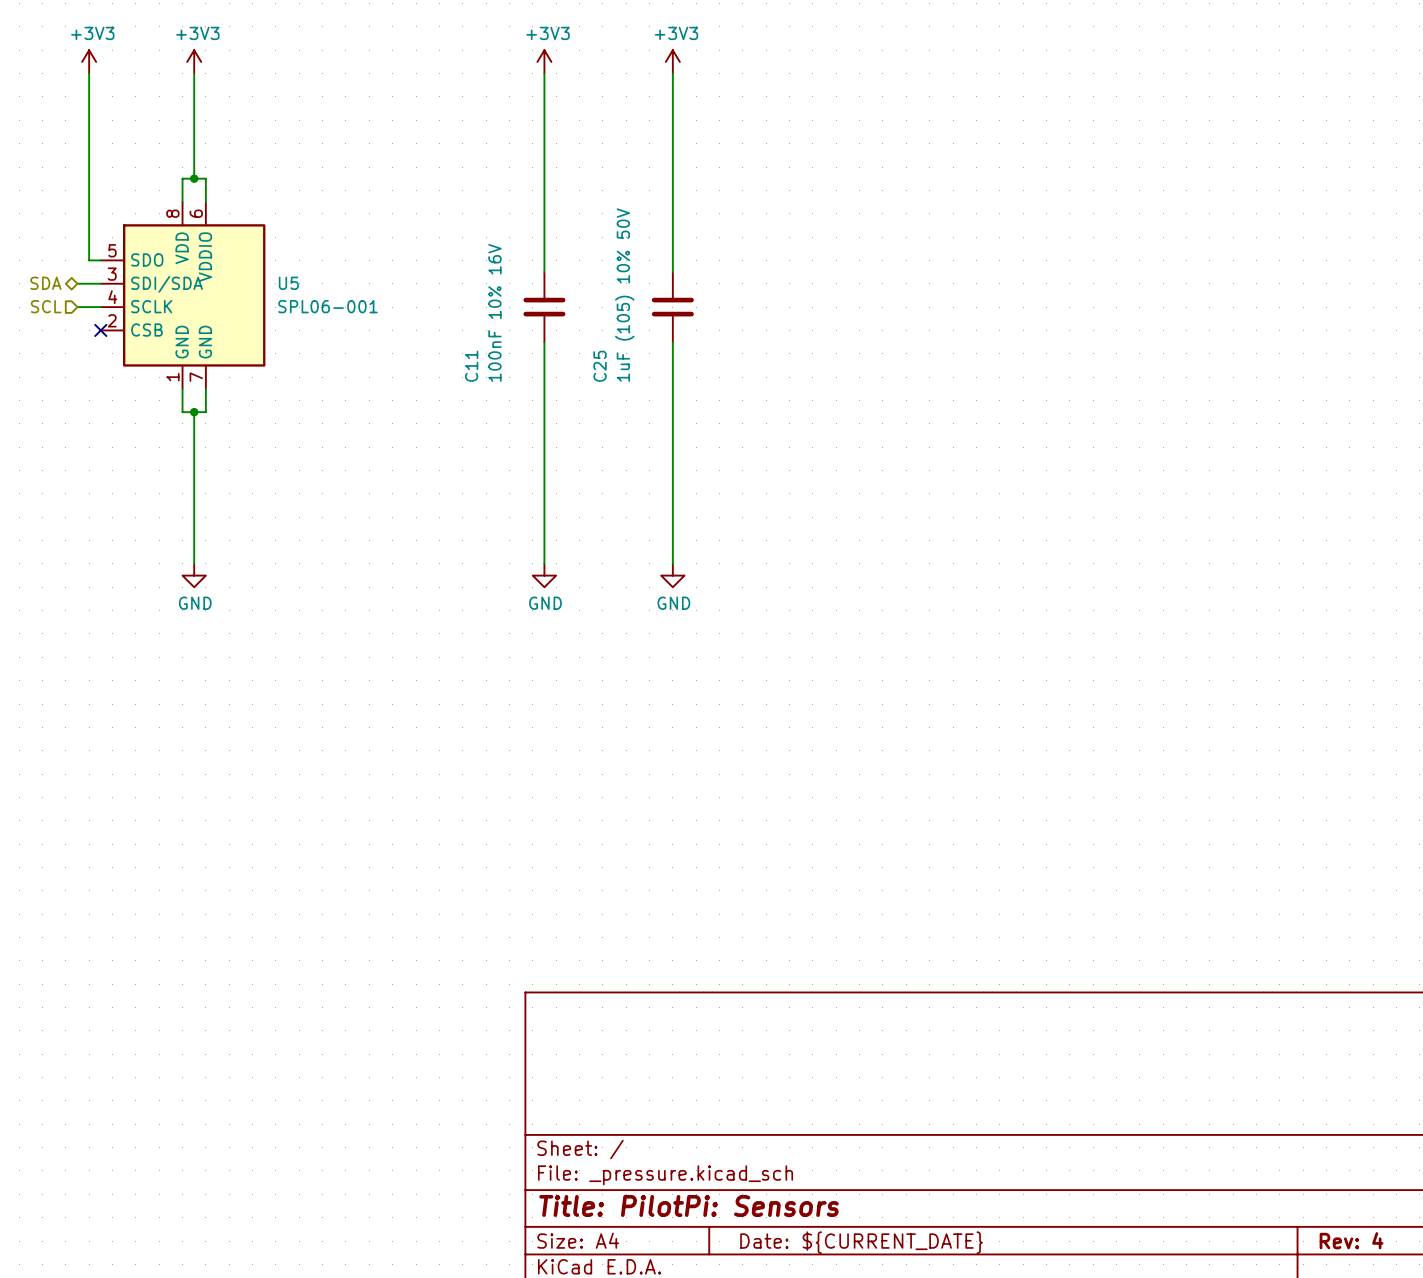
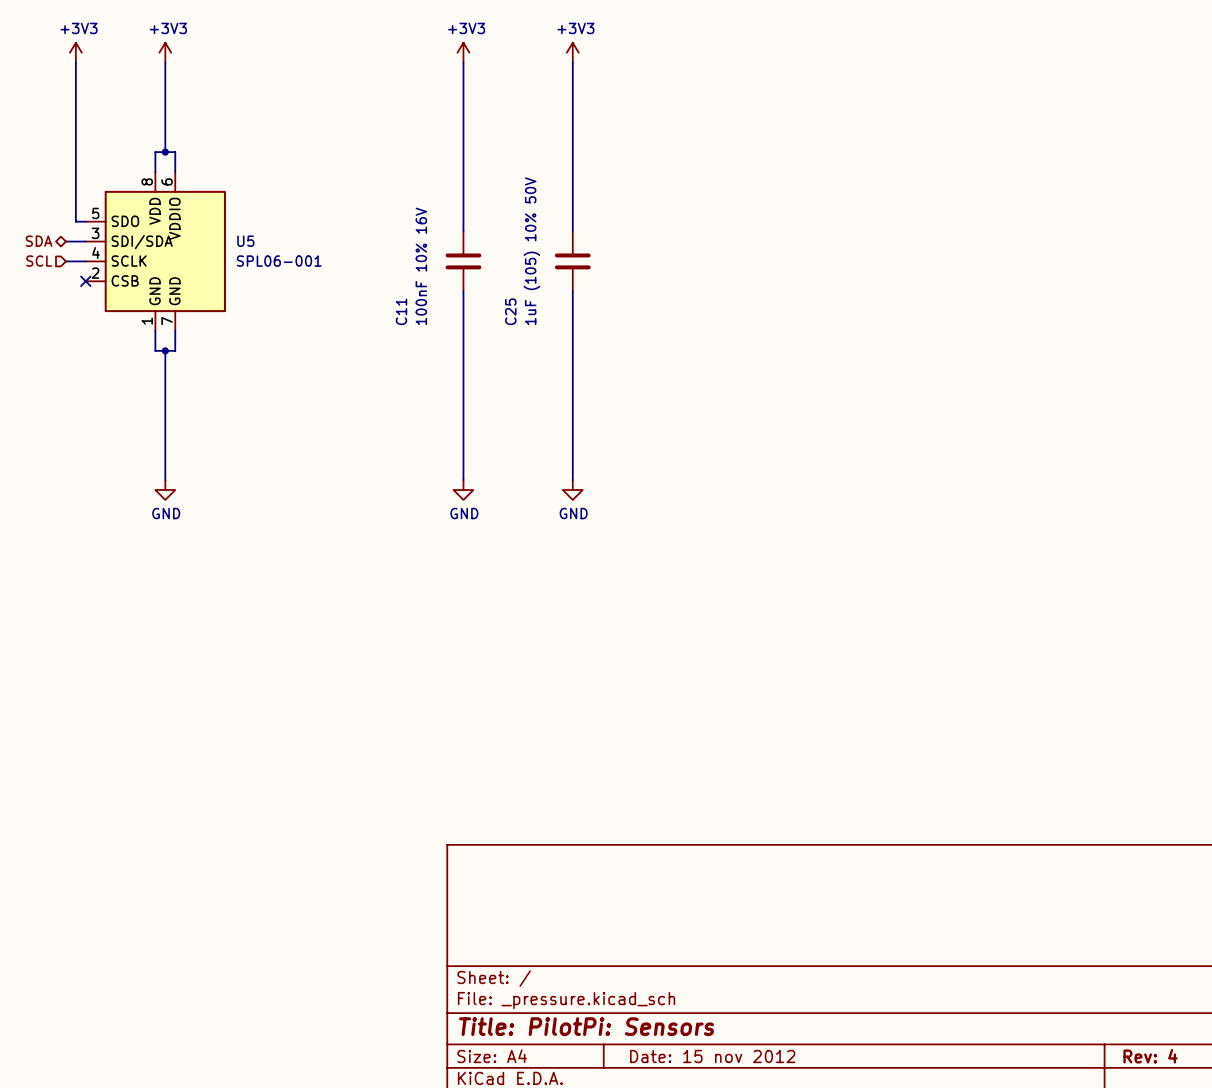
title block: Date: ${CURRENT_DATE} (861, 1242) -> Date: 15 nov 2012 (712, 1056)

